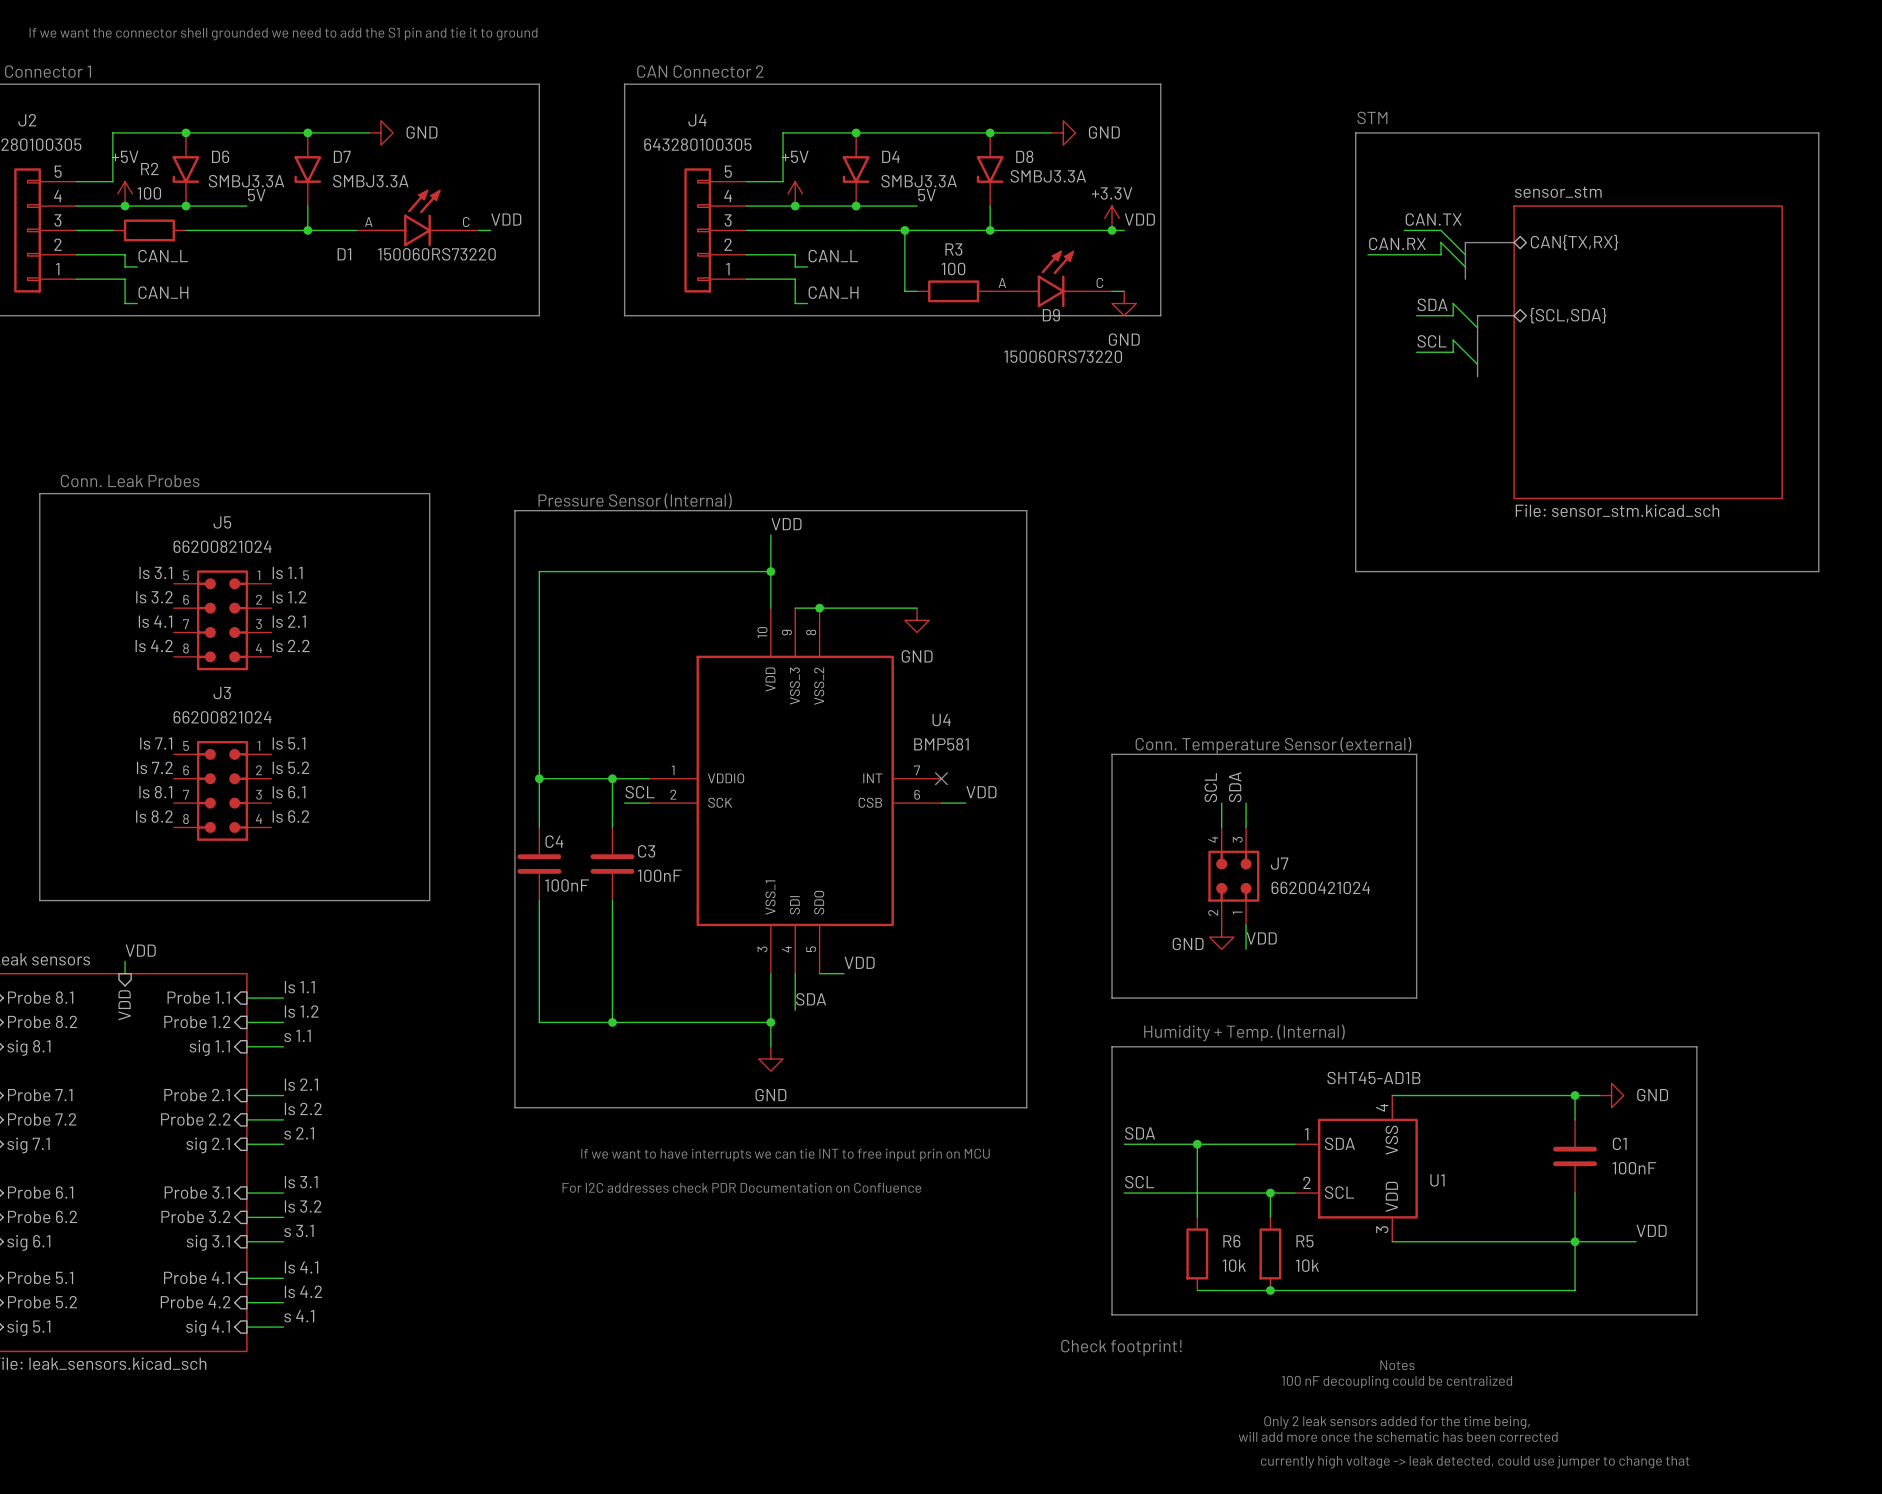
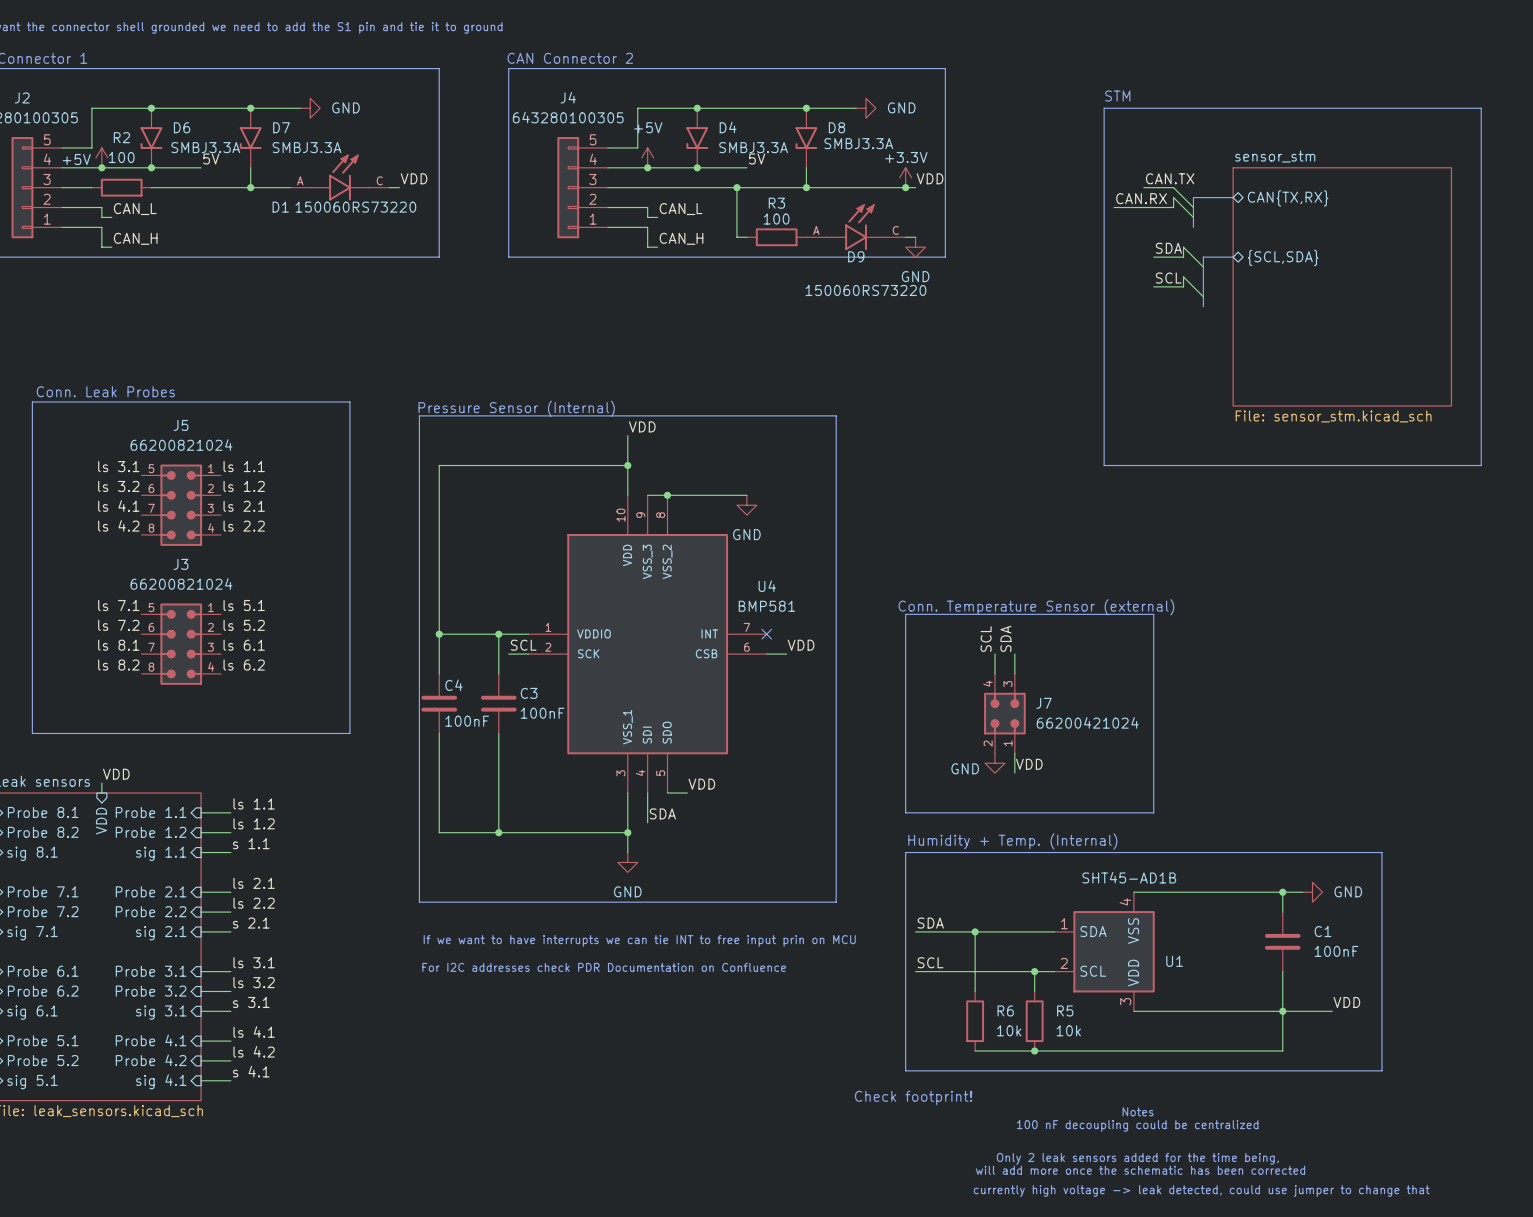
power symbol text position: +5V (125, 156) -> +5V (76, 159)

